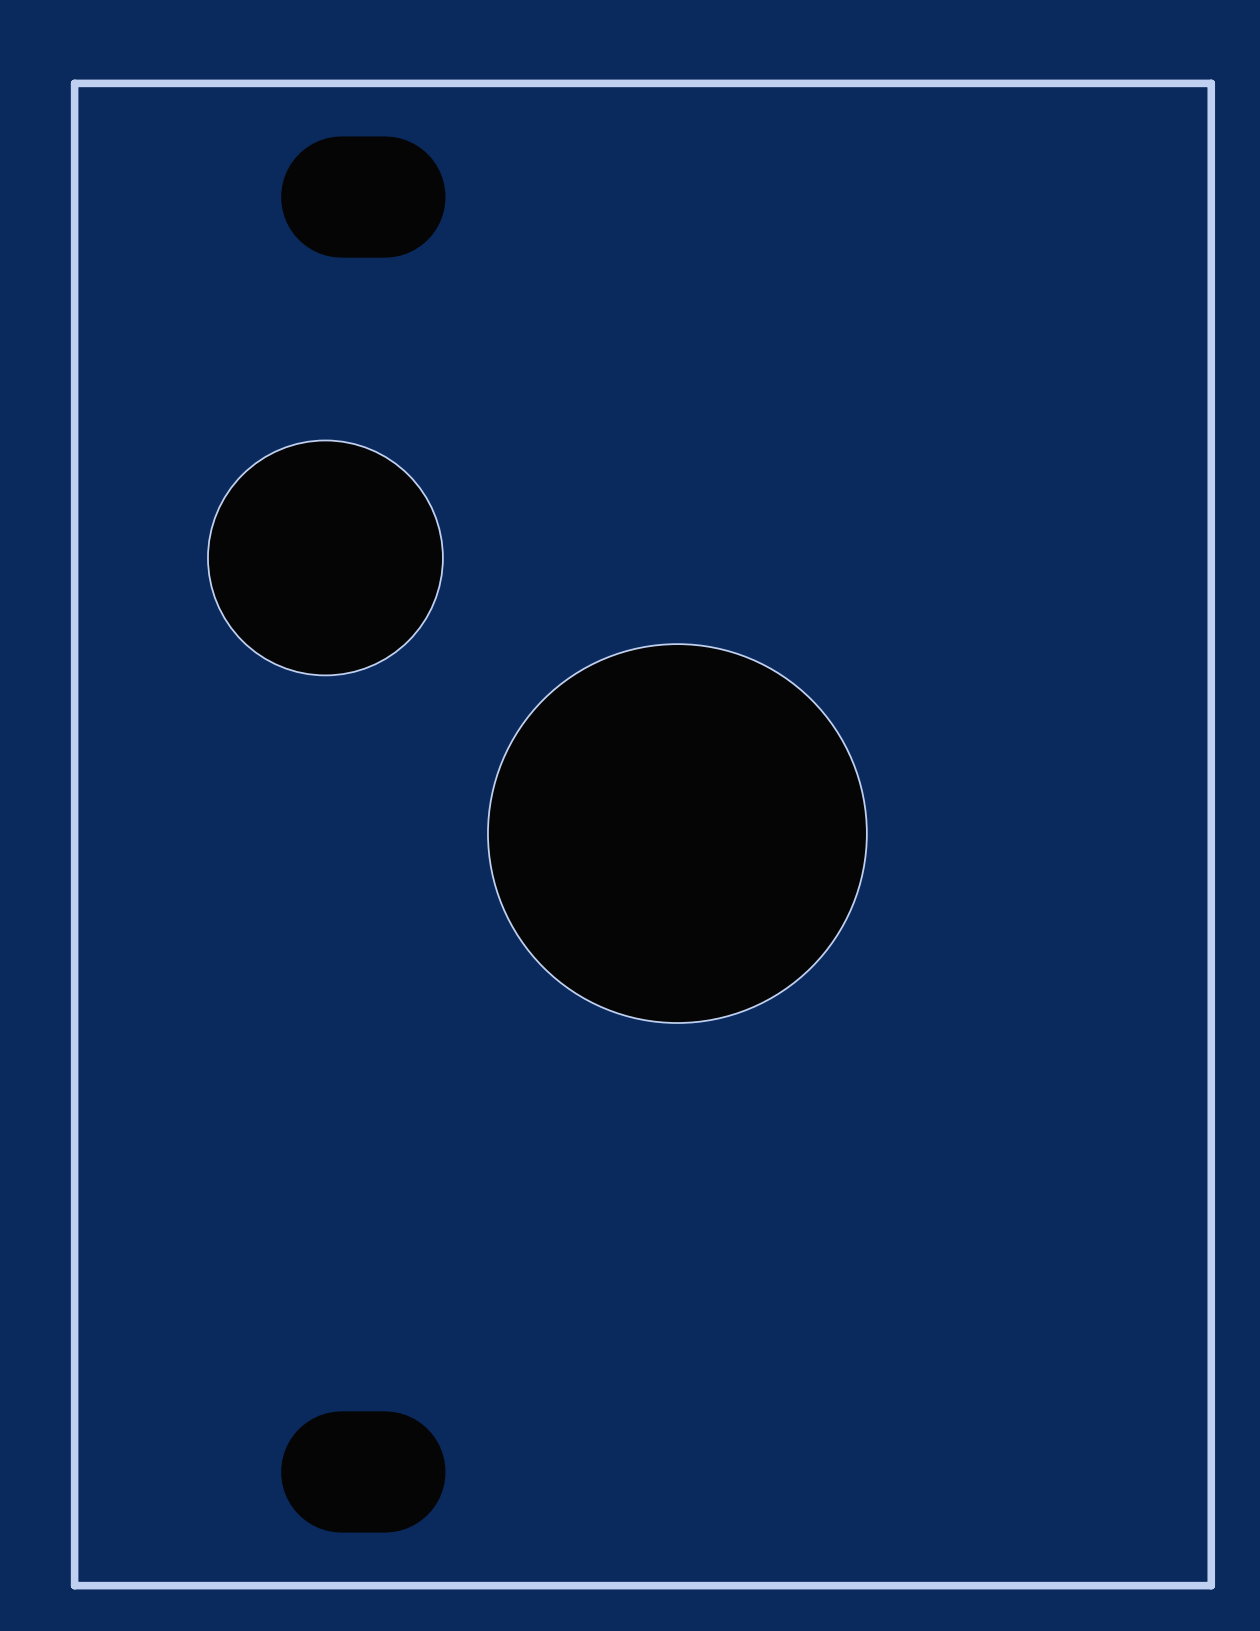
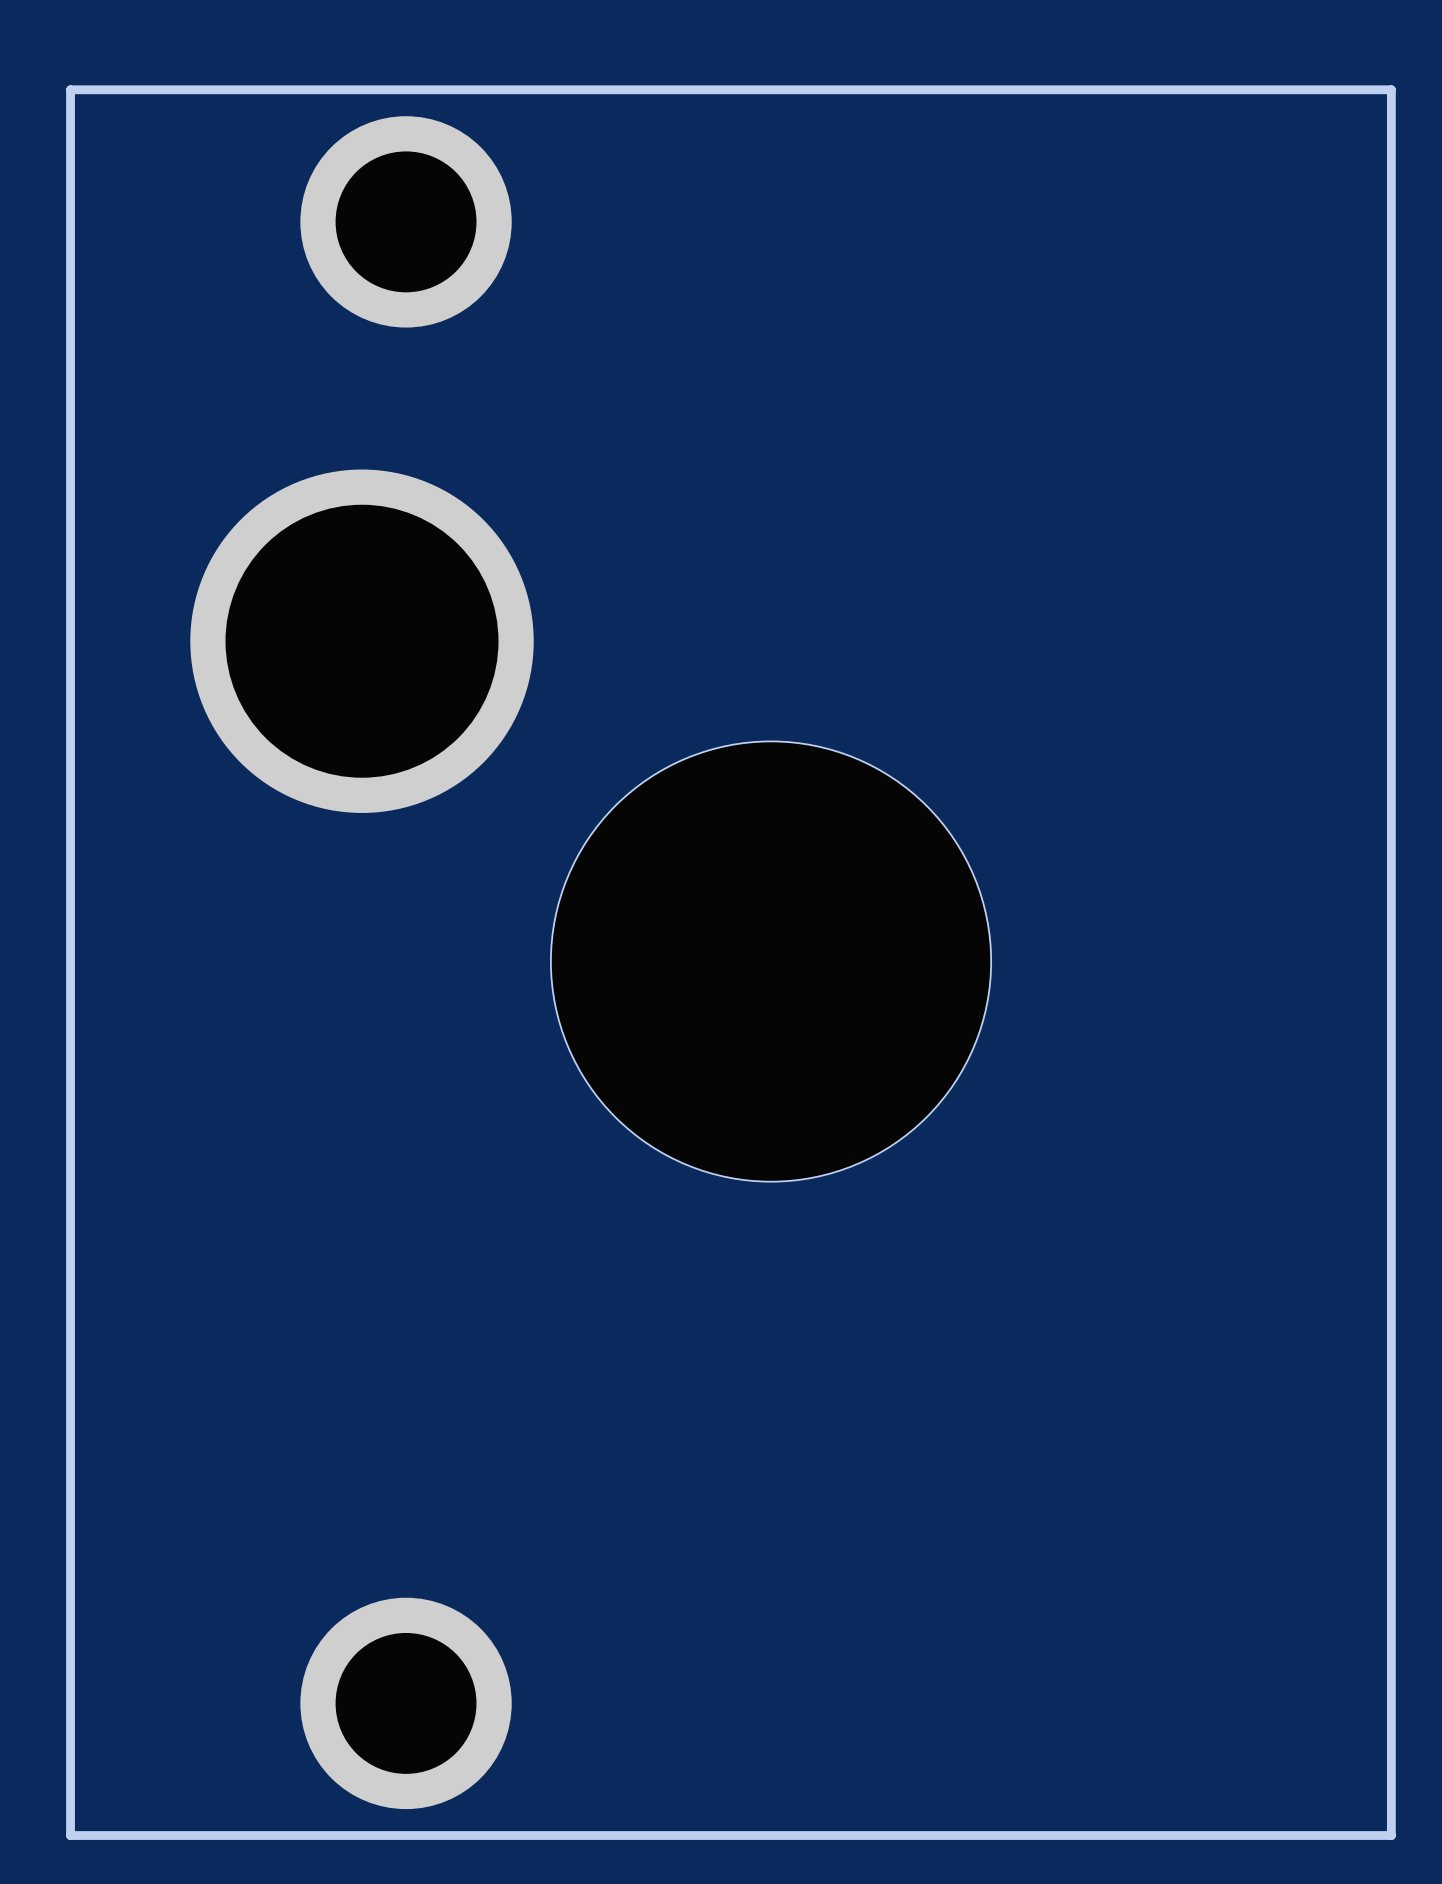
part footprint: [281, 136, 446, 258] -> [300, 116, 512, 328]
part footprint: [207, 440, 443, 676] -> [190, 469, 534, 813]
part footprint: [281, 1411, 446, 1533] -> [300, 1597, 512, 1810]

